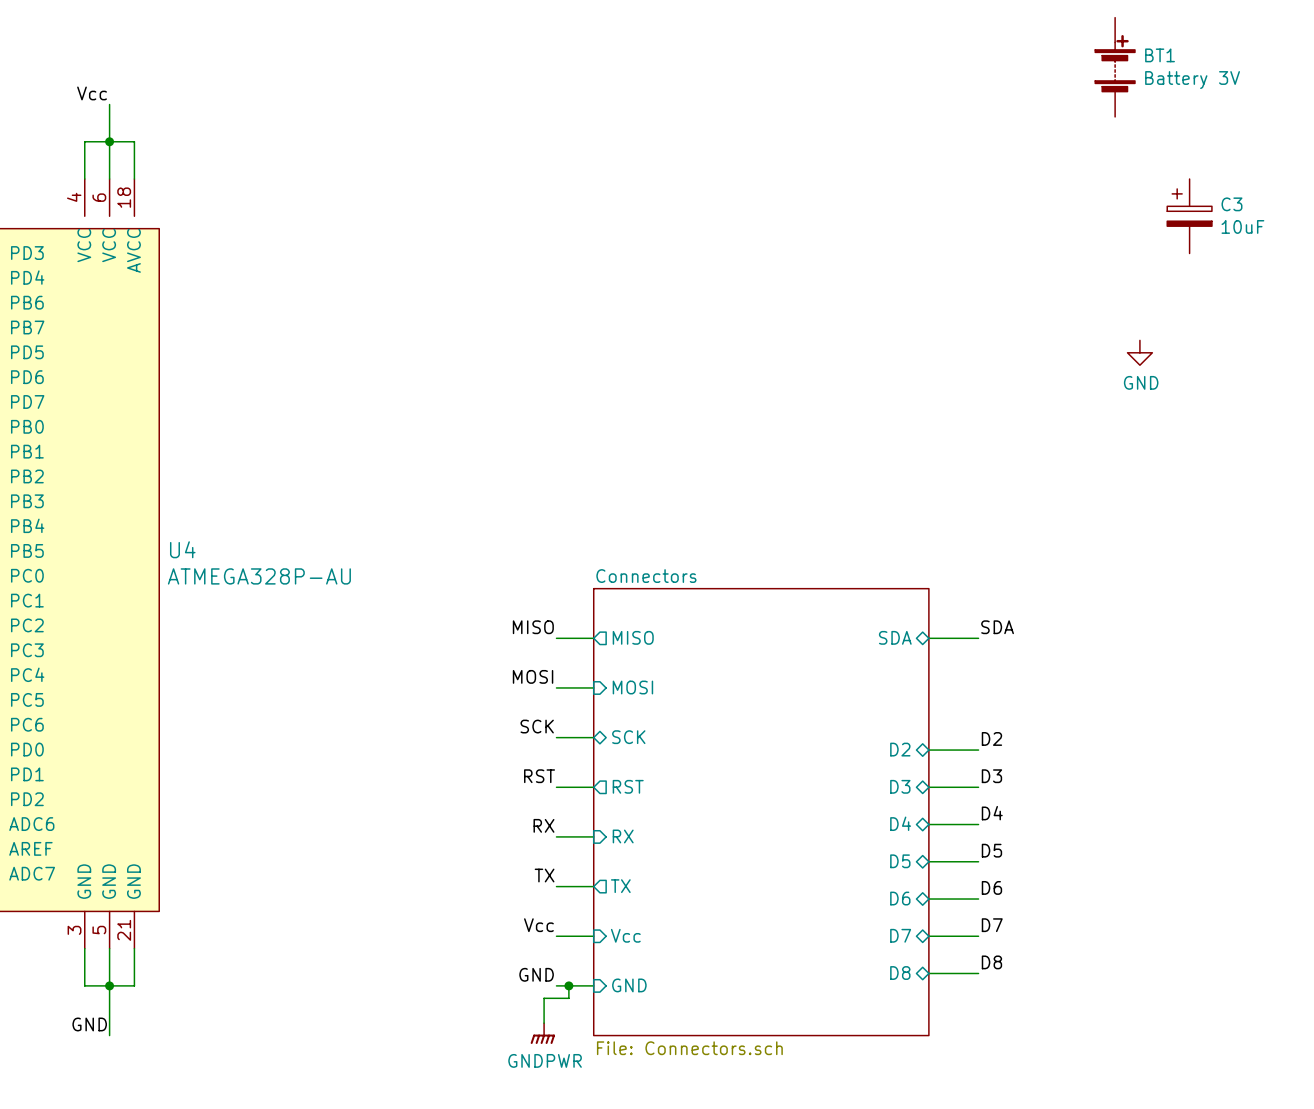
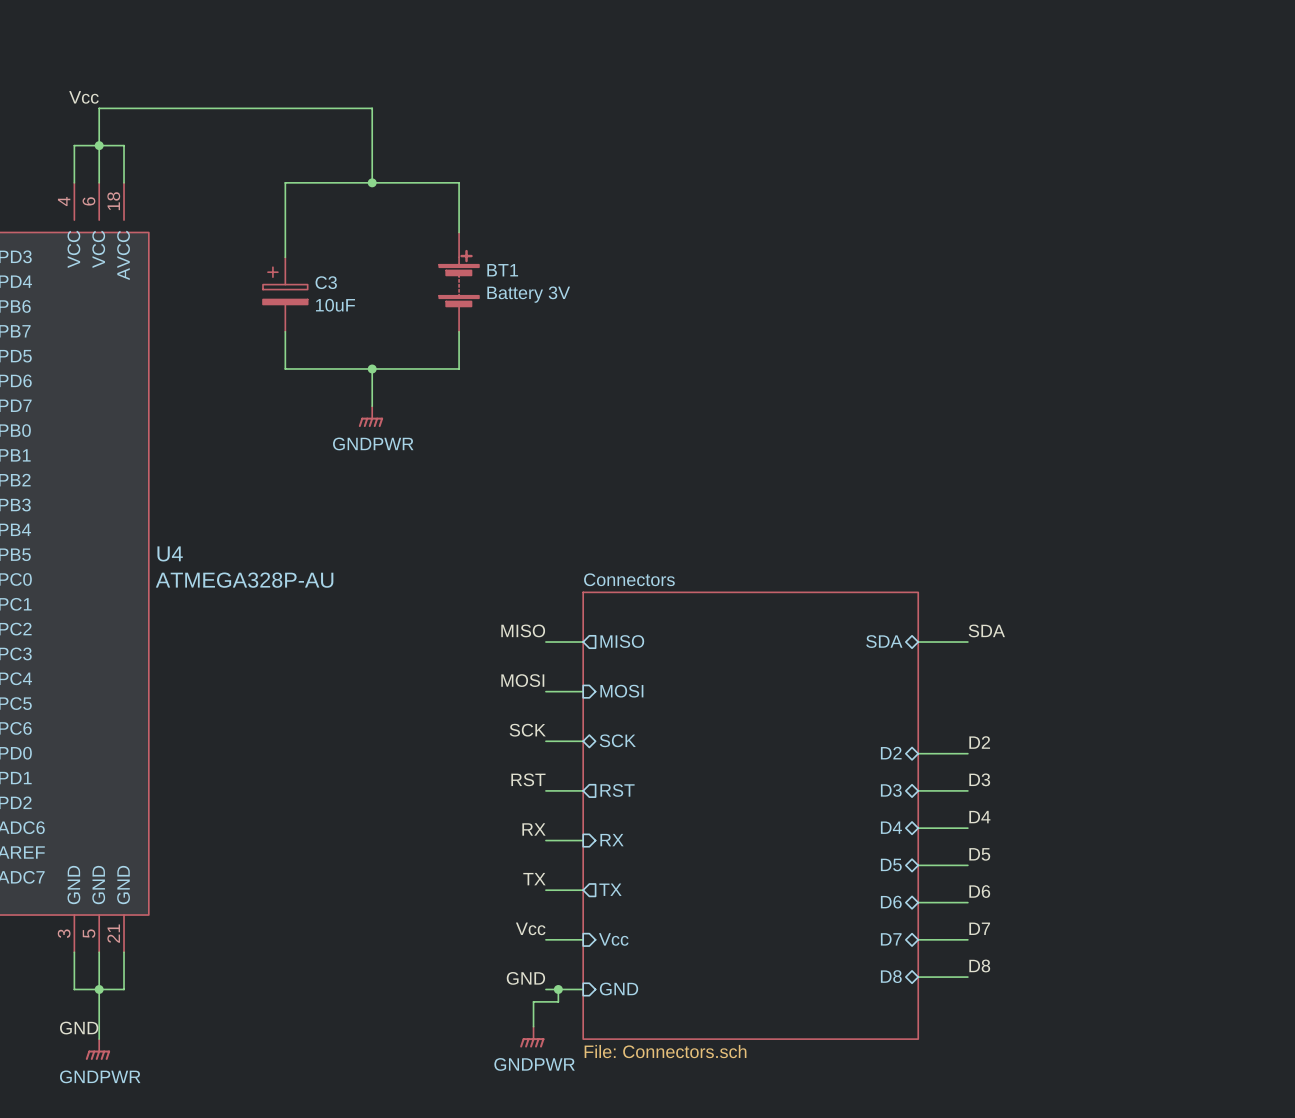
BT1 position: (1115, 67) -> (459, 282)
wire: none -> (99, 108) (372, 108) (372, 182)
junction: none -> (372, 182)
C3 position: (1189, 216) -> (285, 294)
wire: none -> (459, 232) (459, 182) (285, 182) (285, 257)
wire: none -> (285, 331) (285, 368) (459, 368) (459, 331)
power symbol: GND (1139, 352) -> none
wire: none -> (372, 368) (372, 406)
junction: none -> (372, 368)
power symbol: none -> GNDPWR (370, 416)
power symbol: none -> GNDPWR (97, 1049)

